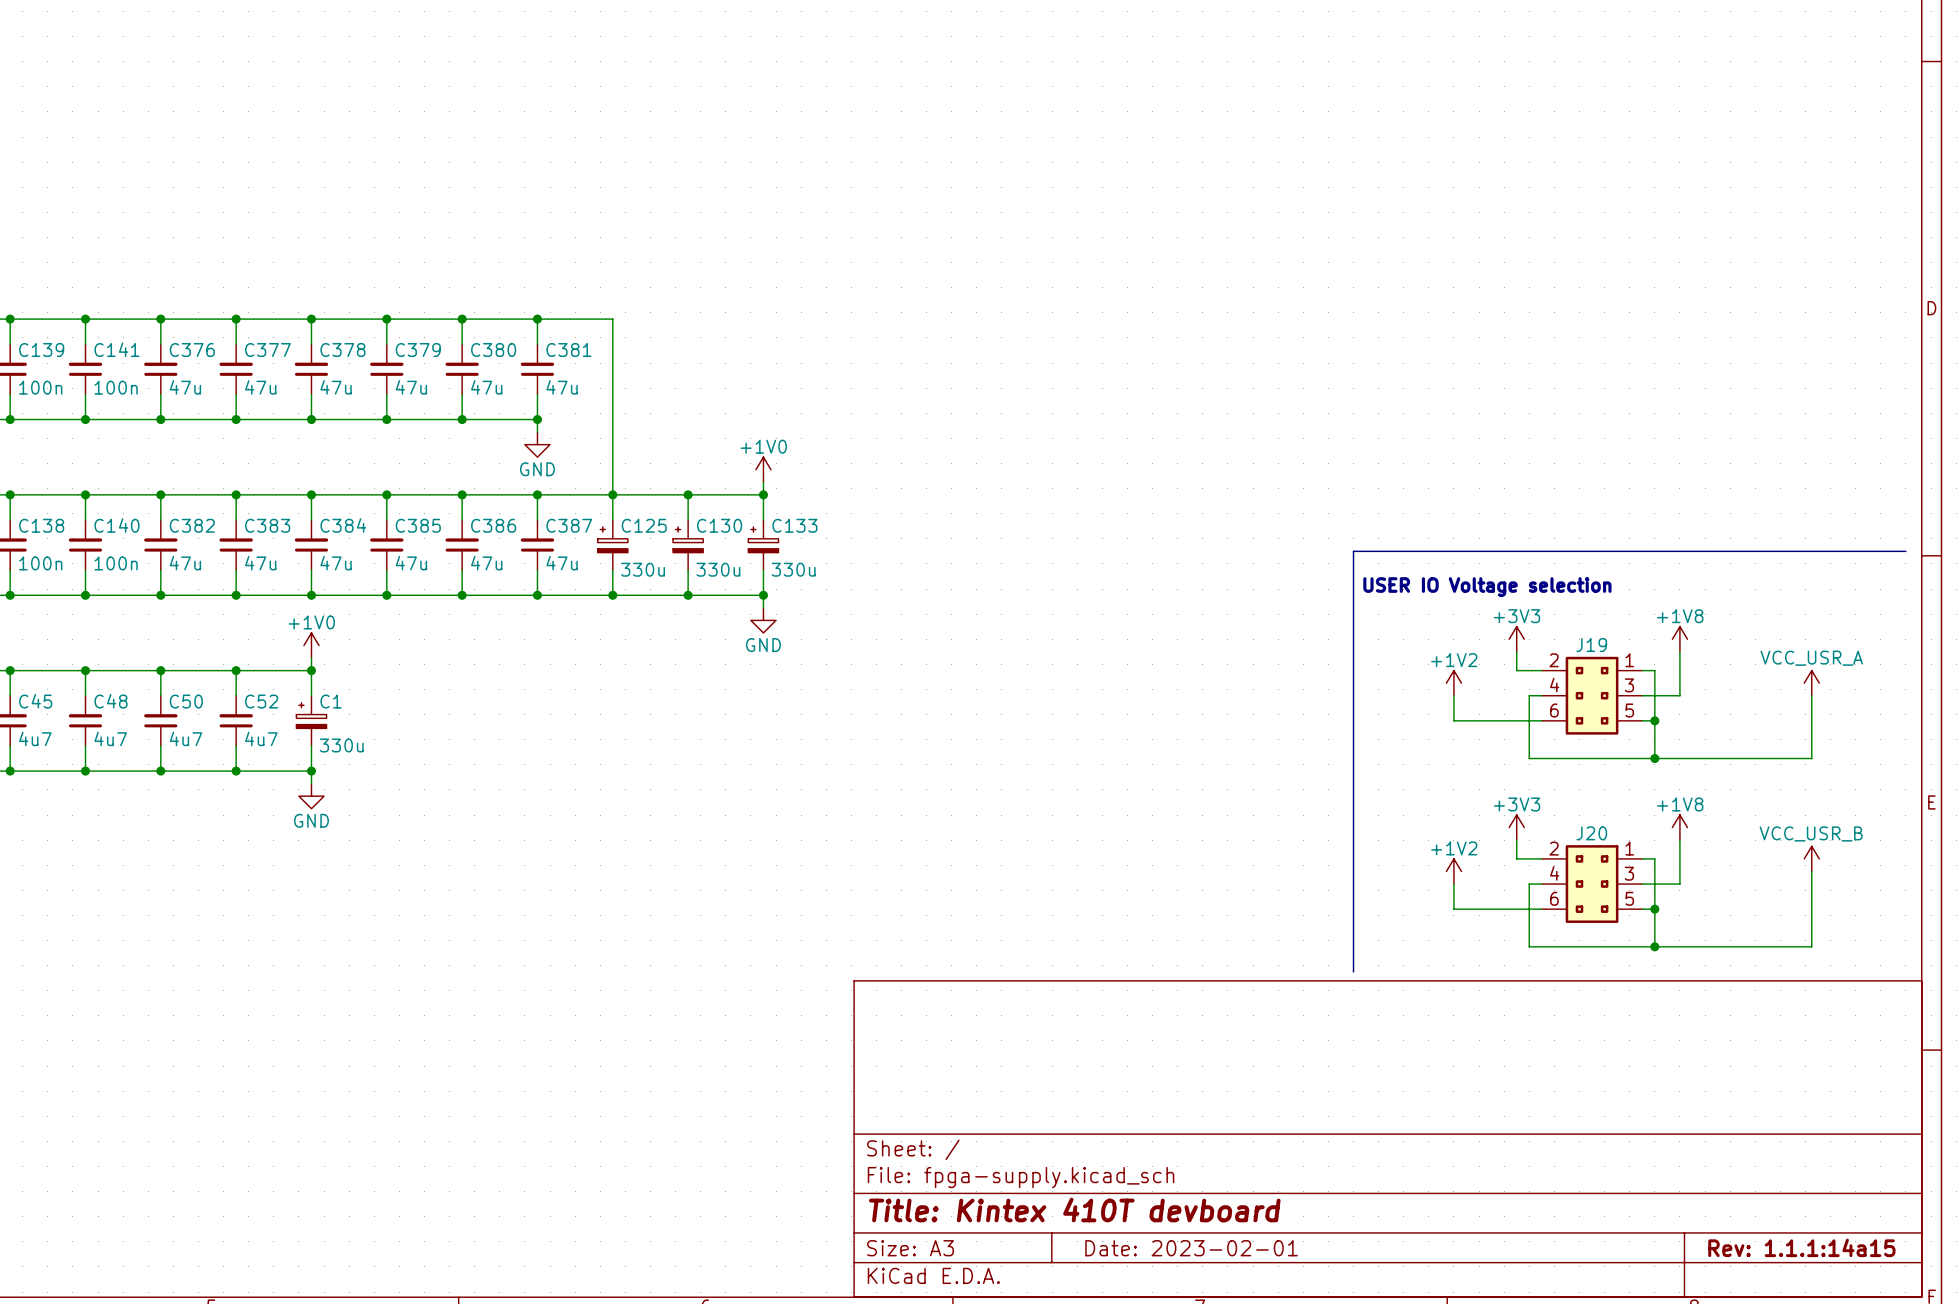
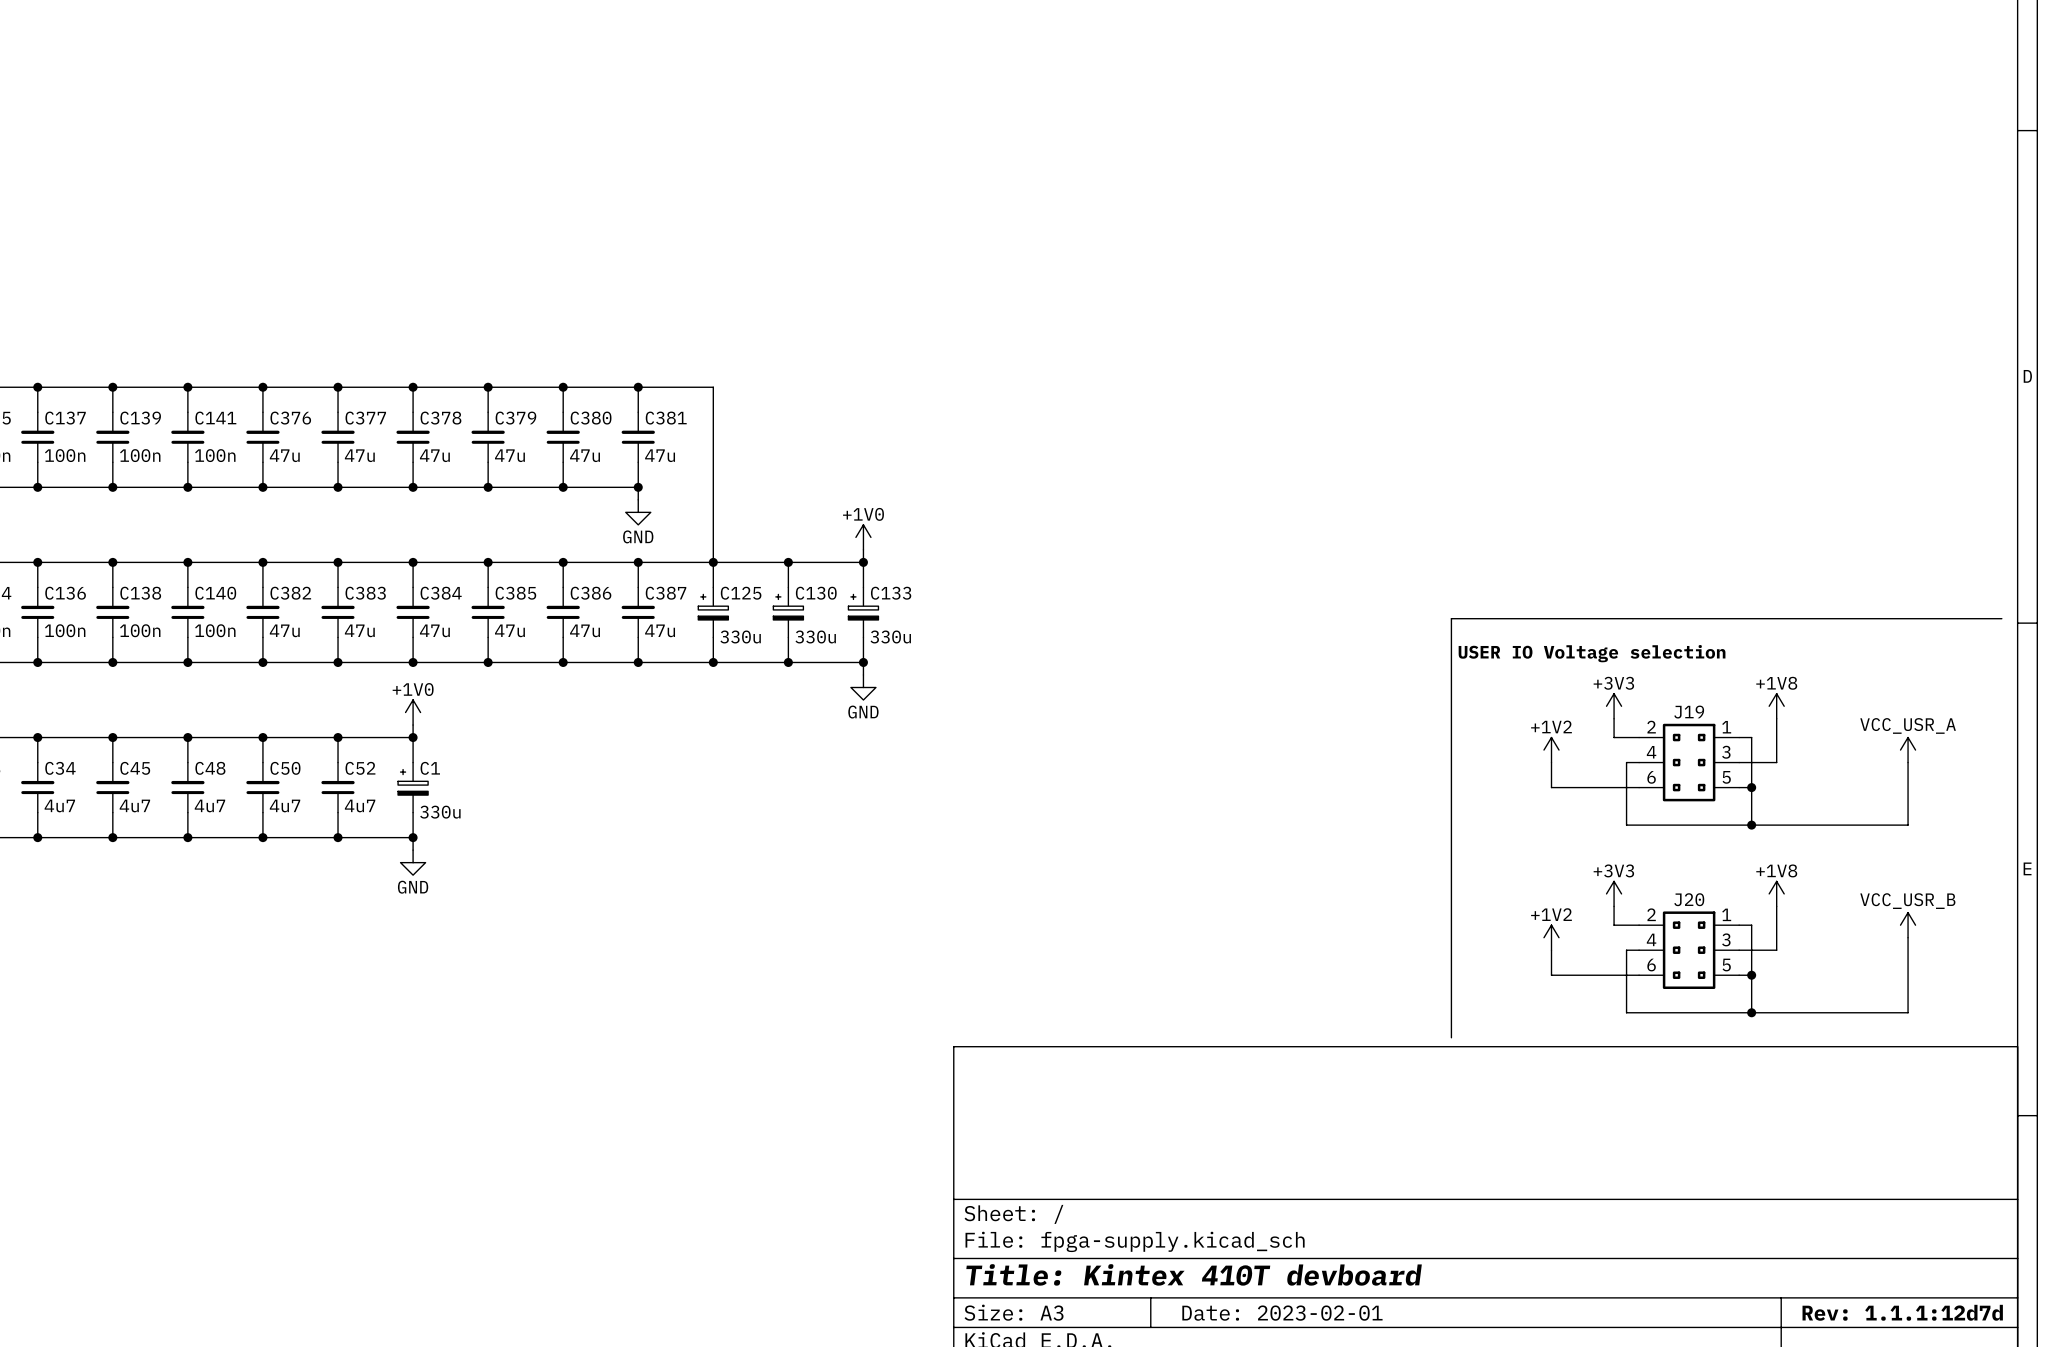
title block: Rev: 1.1.1:14a15 (1801, 1247) -> Rev: 1.1.1:12d7d (1902, 1312)

